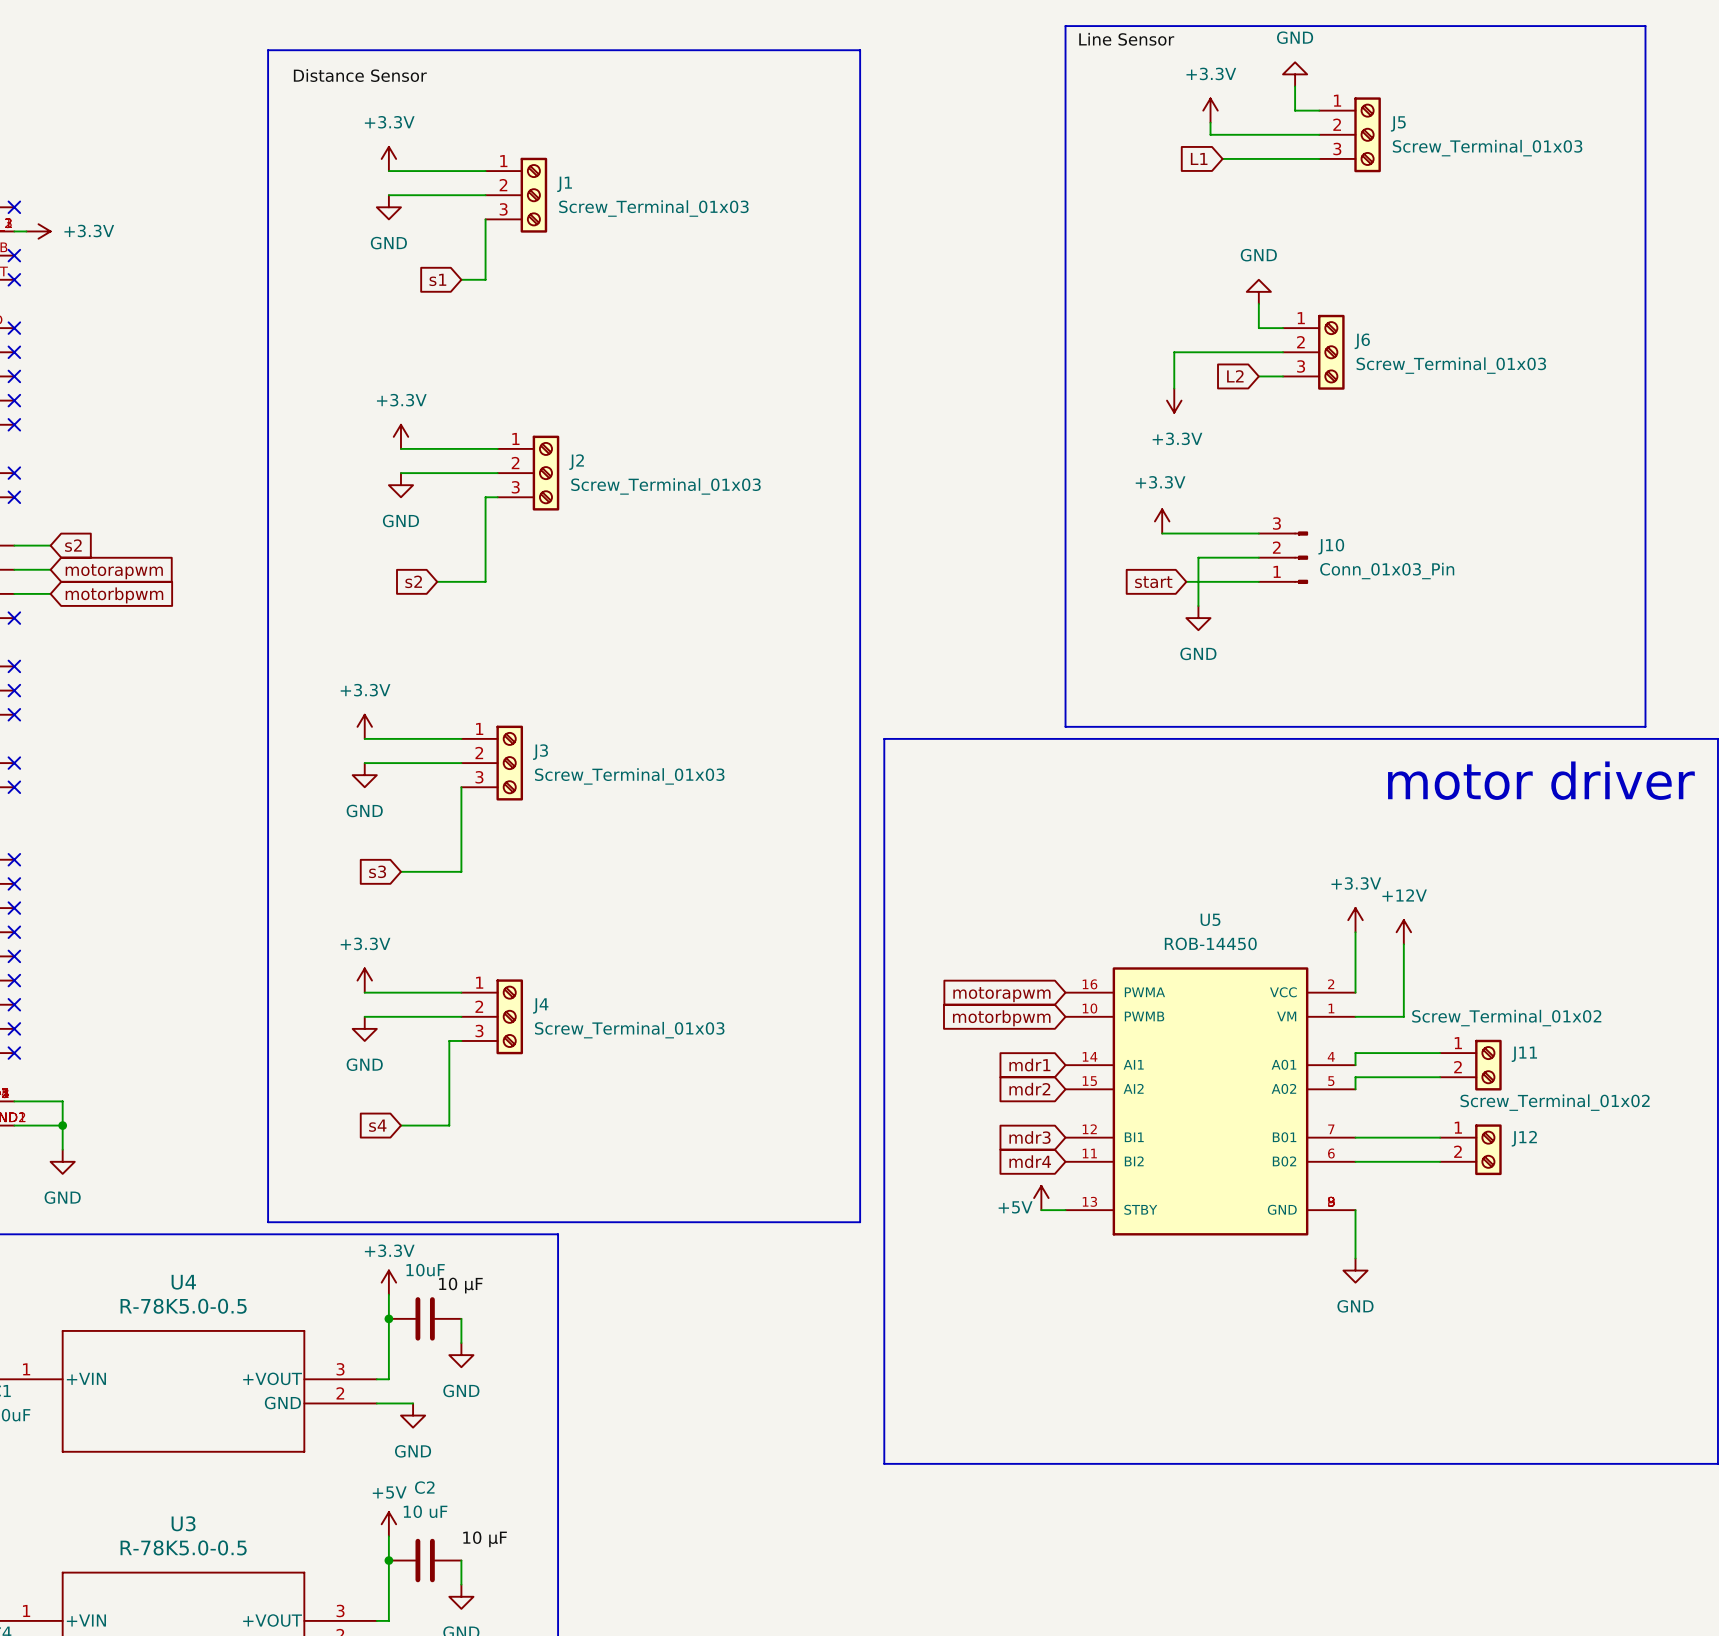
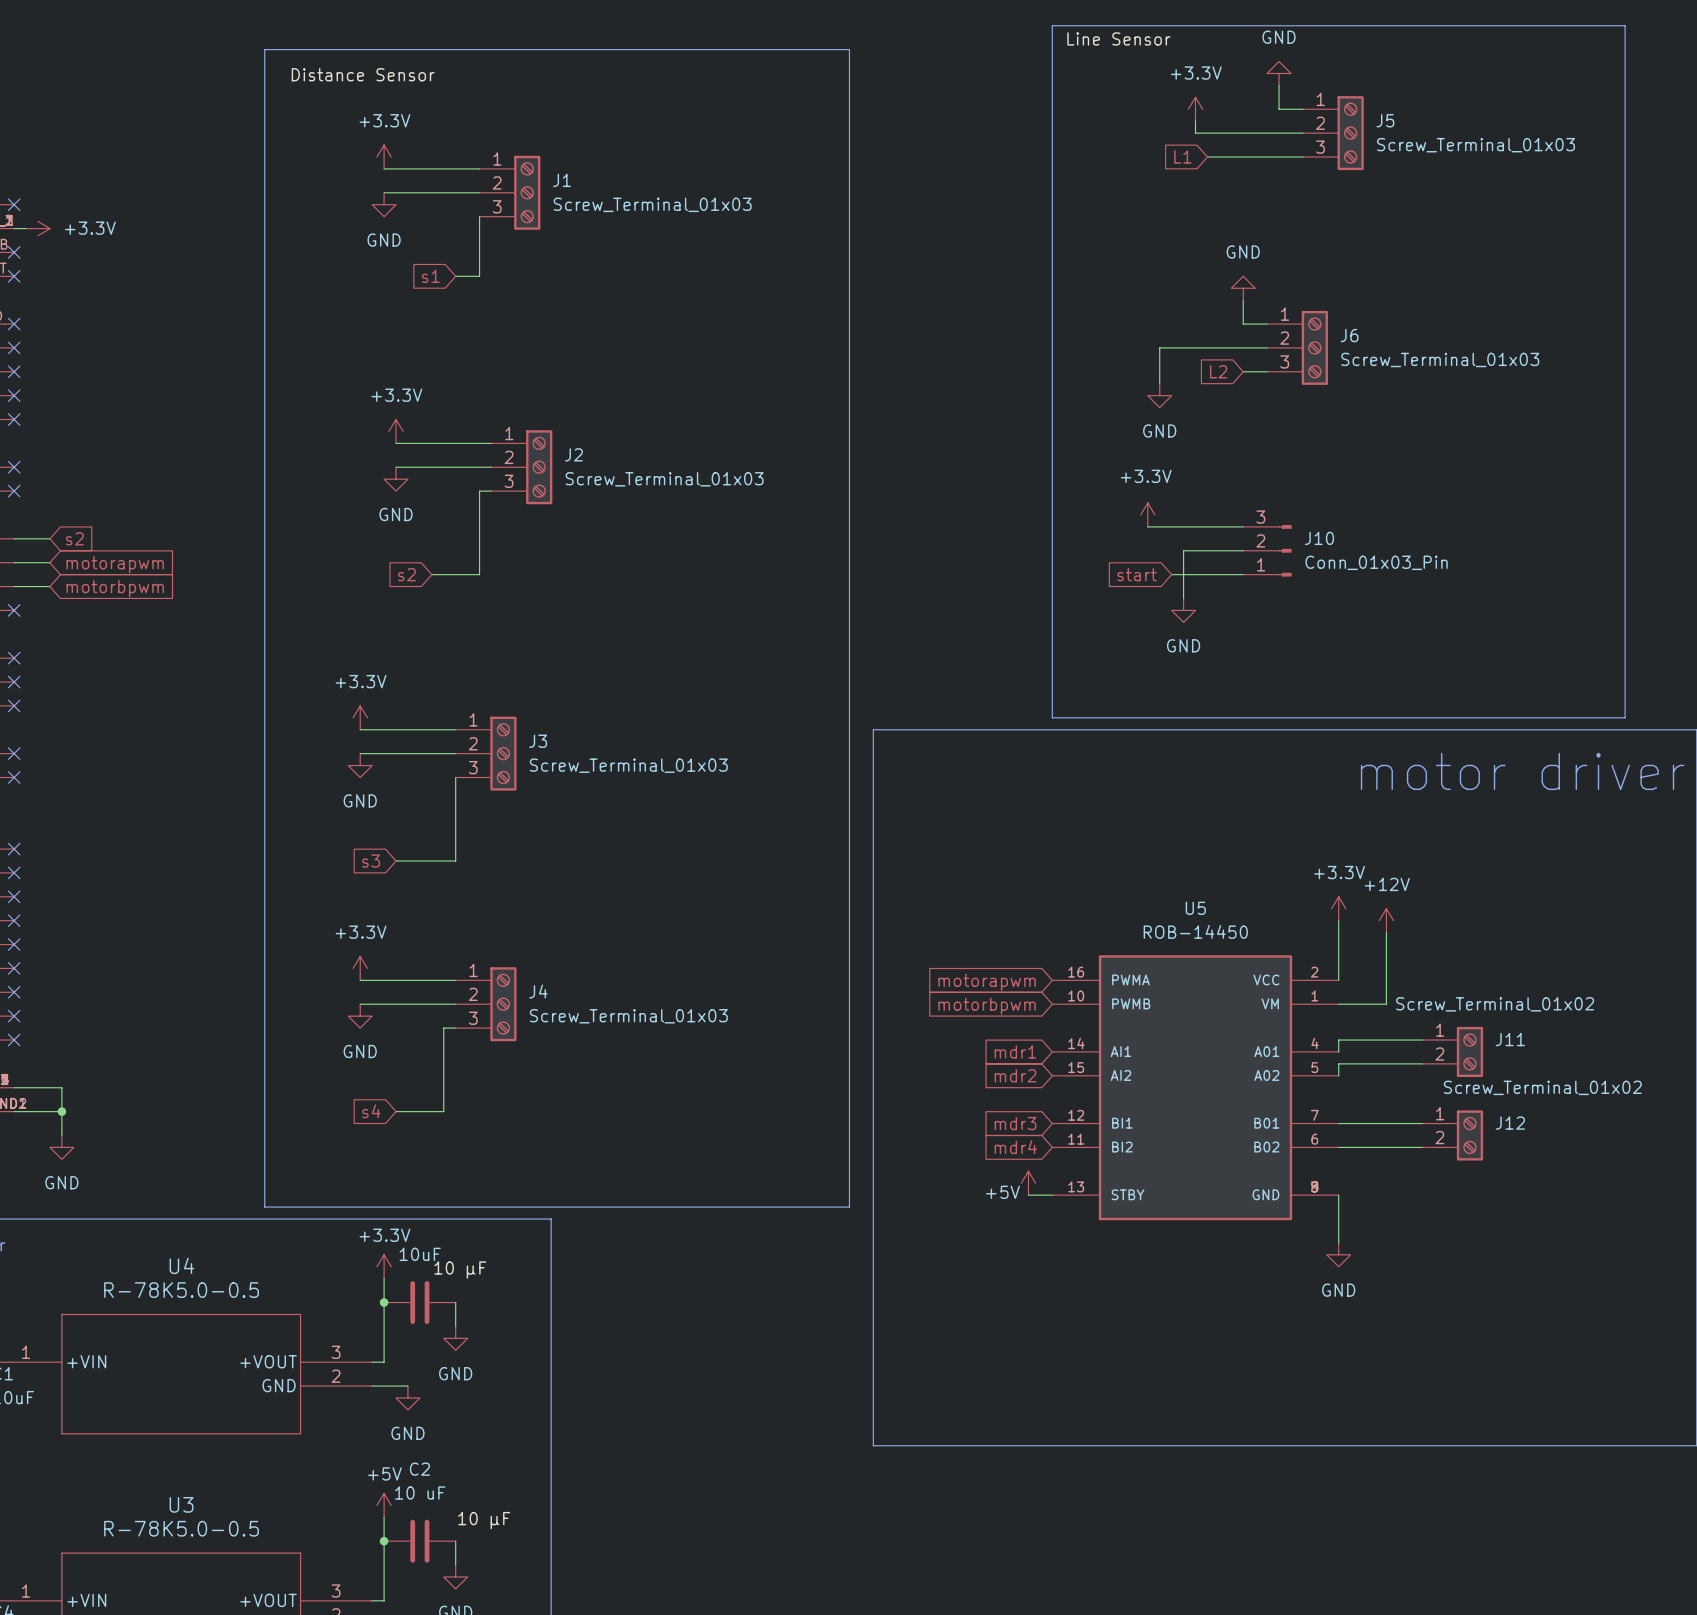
power symbol: +3.3V (1174, 400) -> GND (1159, 395)

